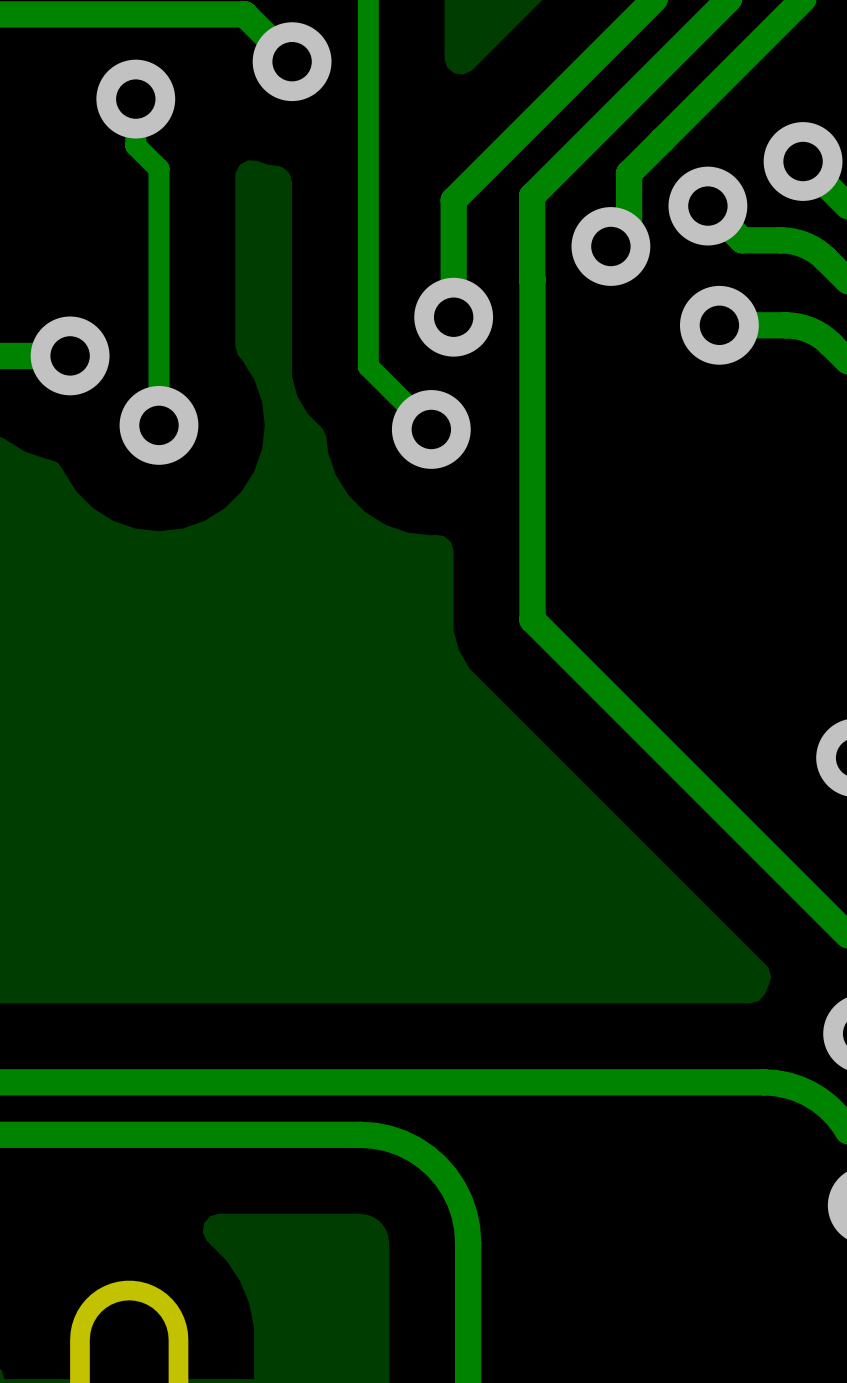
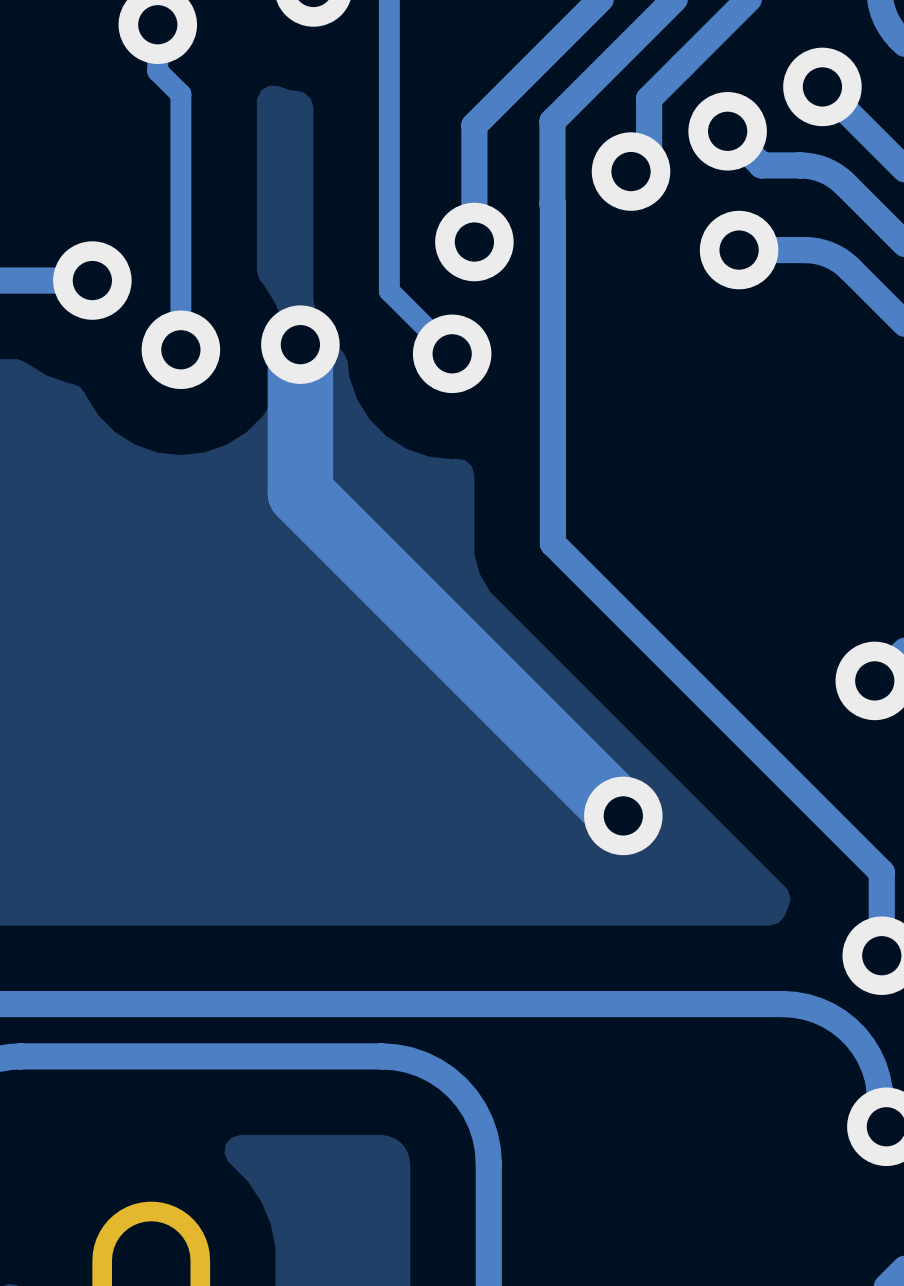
track: none -> (300, 344) (300, 492) (623, 815)
via: none -> (300, 344)
via: none -> (623, 815)

